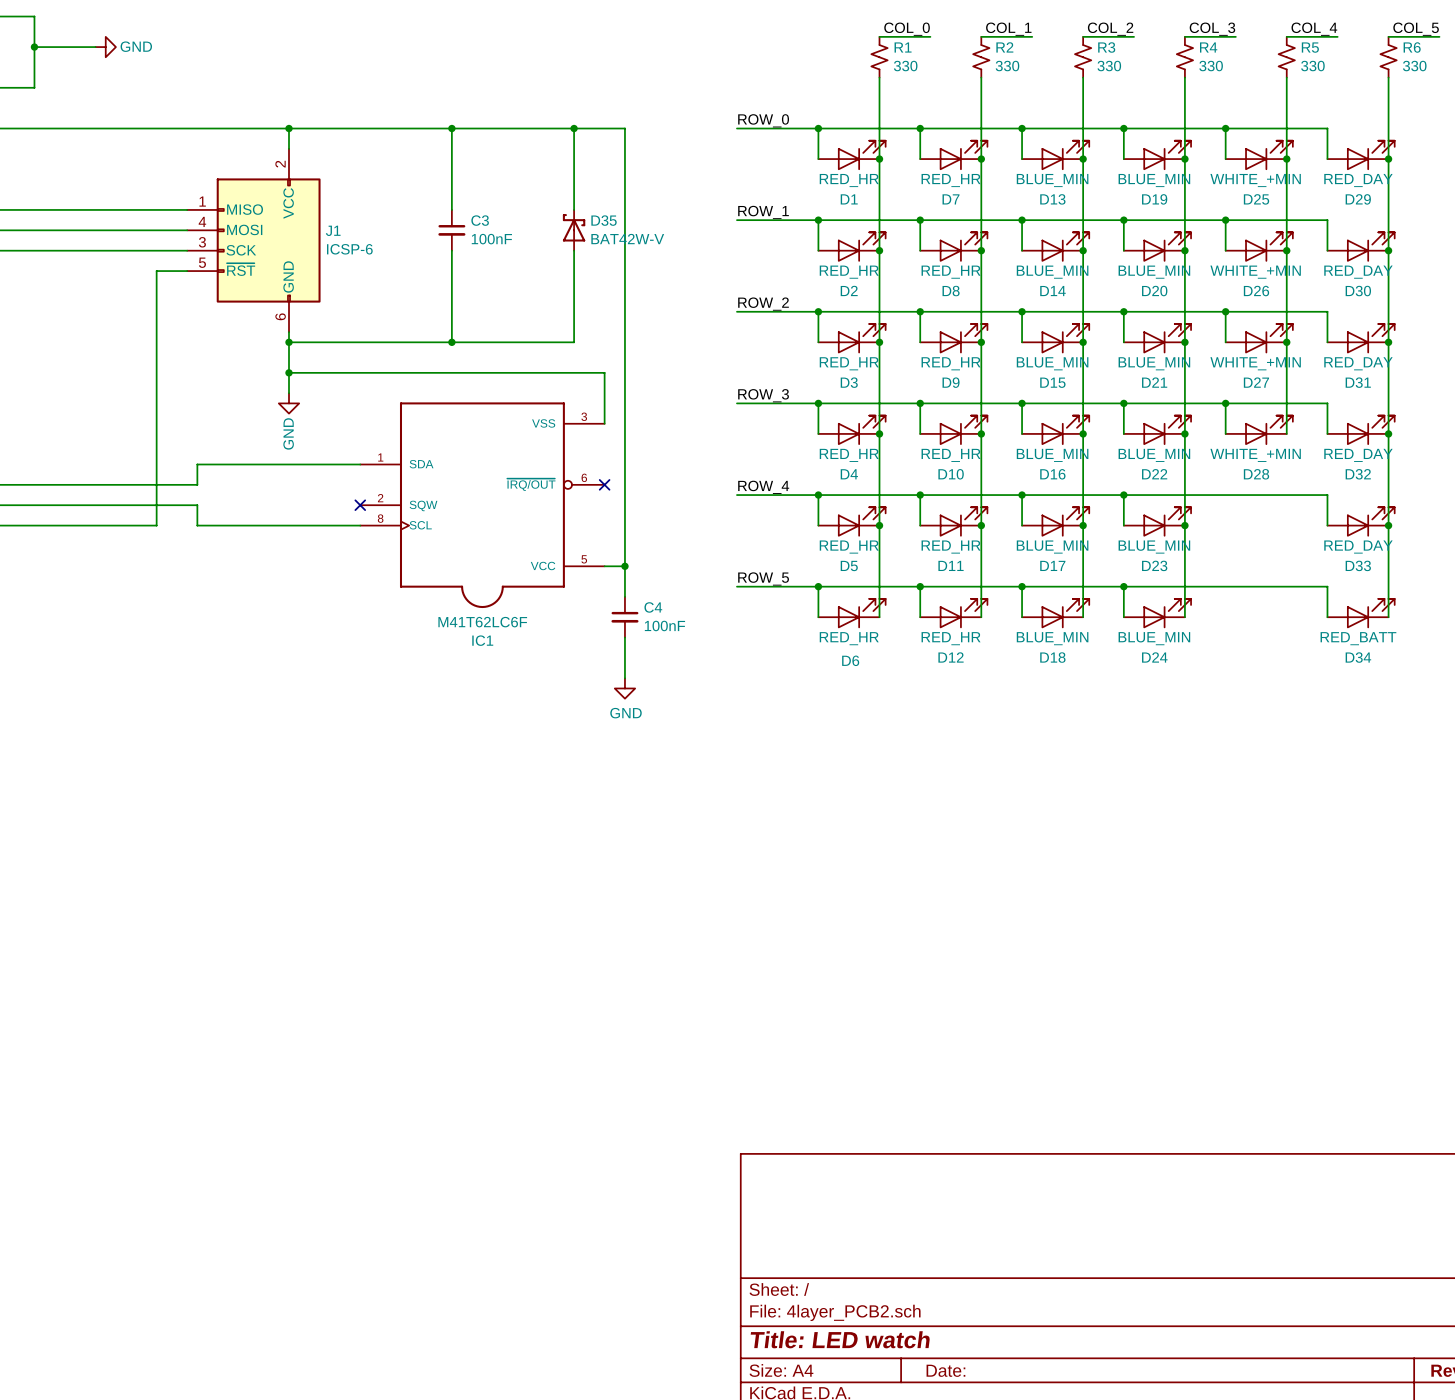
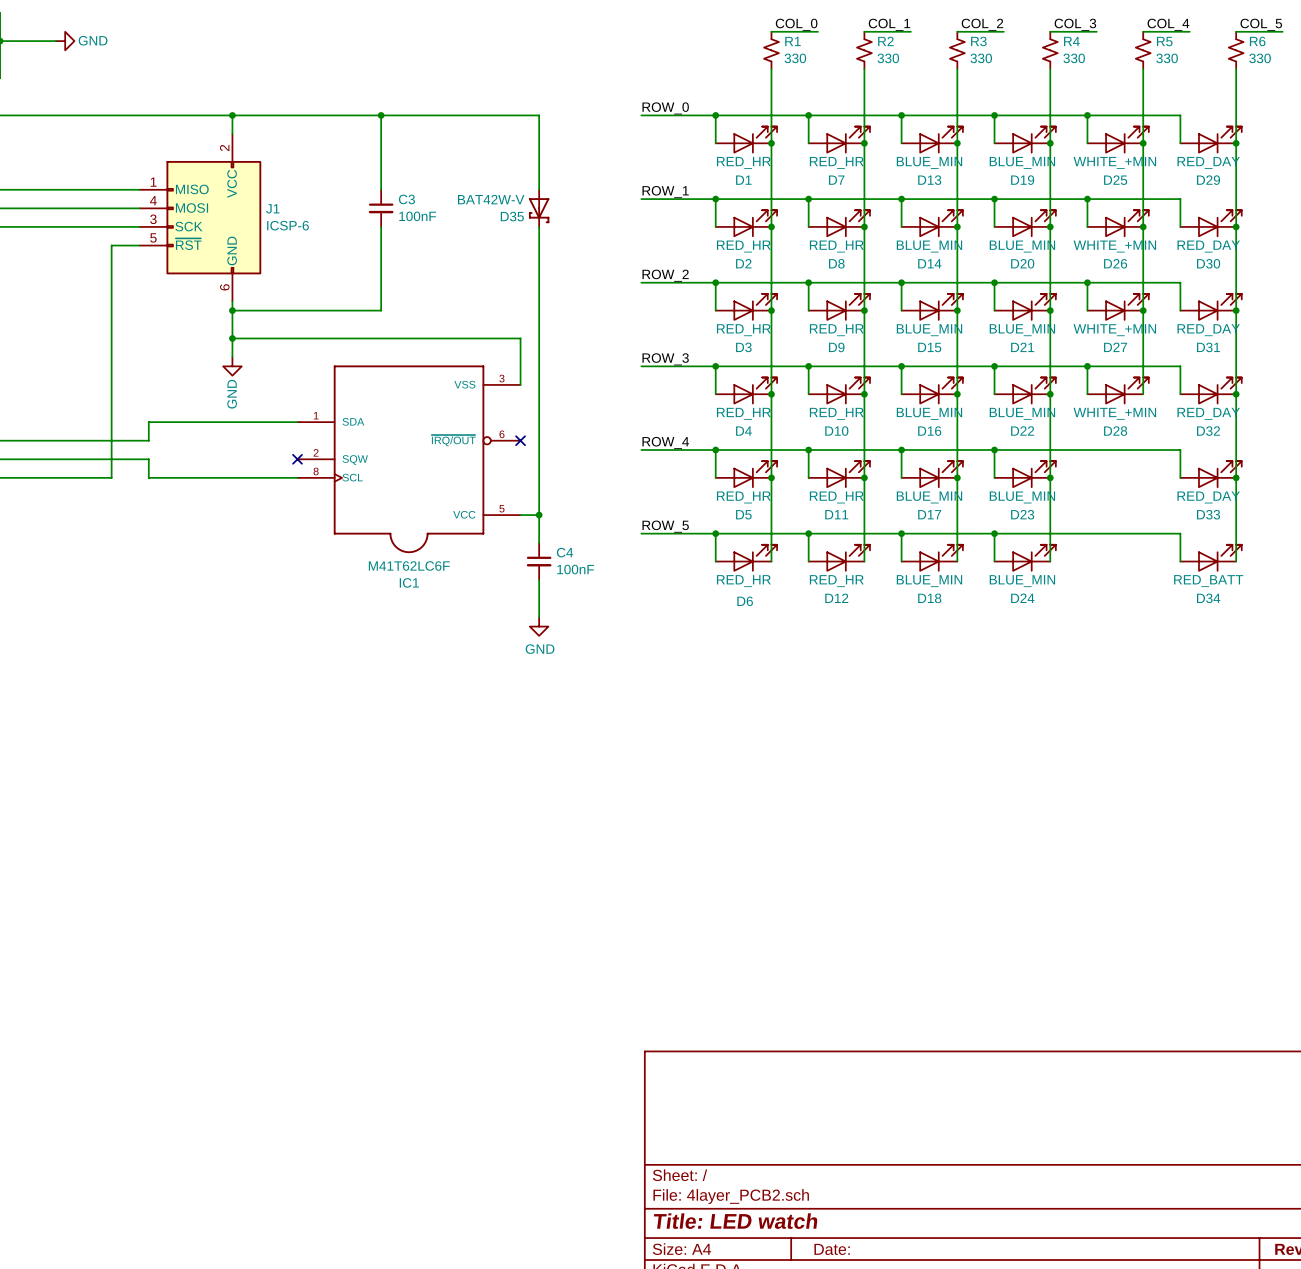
wire: (574, 128) (574, 209) -> none
junction: (574, 128) -> none
D35 rotation: 0° (574, 227) -> 180° (539, 210)
D35 position: (574, 230) -> (539, 208)
wire: (574, 250) (574, 342) (451, 342) -> none
junction: (451, 342) -> none

